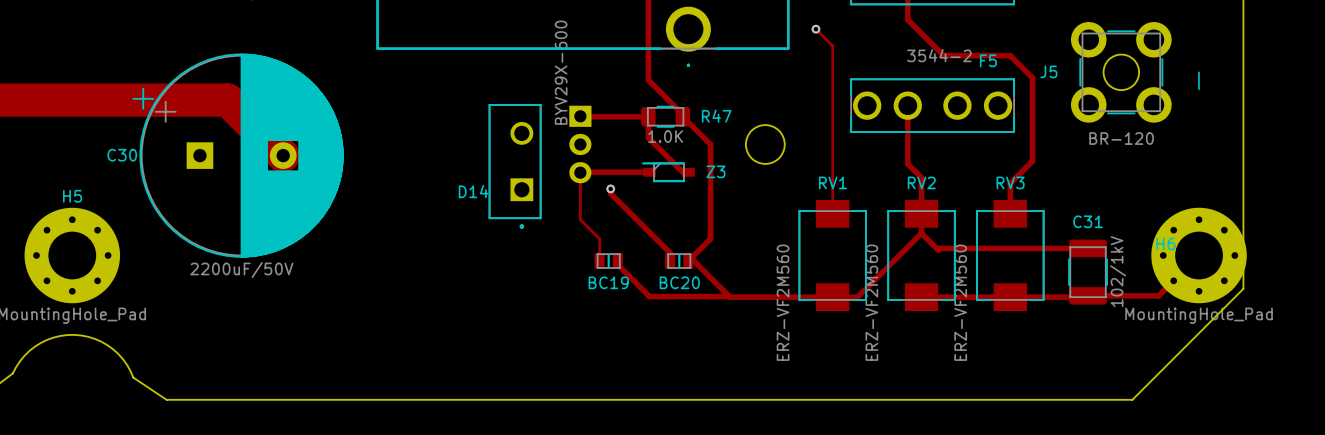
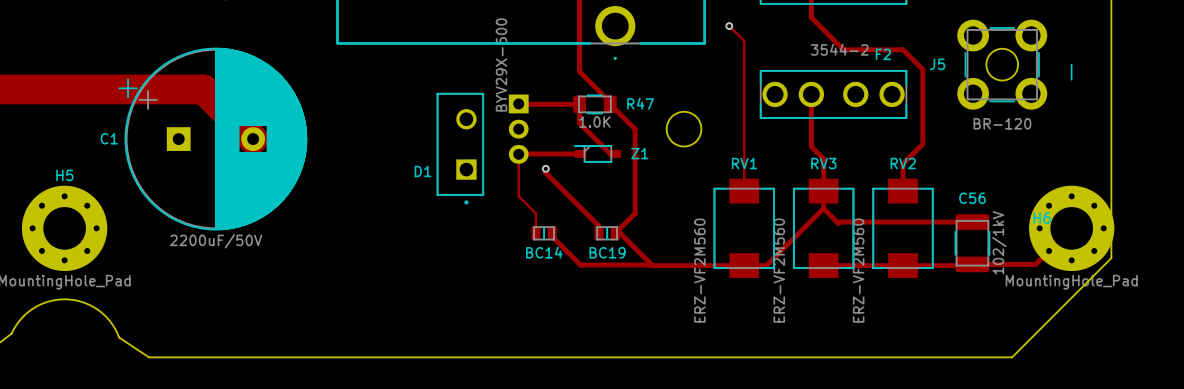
F5 name: F5 (988, 60) -> F2 (883, 54)
C30 name: C30 (122, 155) -> C1 (109, 138)
Z3 name: Z3 (715, 171) -> Z1 (639, 153)
RV2 name: RV2 (921, 182) -> RV3 (823, 163)
RV3 name: RV3 (1010, 182) -> RV2 (903, 163)
D14 name: D14 (473, 191) -> D1 (423, 171)
C31 name: C31 (1088, 221) -> C56 (972, 198)
BC19 name: BC19 (608, 282) -> BC14 (544, 252)
BC20 name: BC20 (679, 282) -> BC19 (607, 252)

